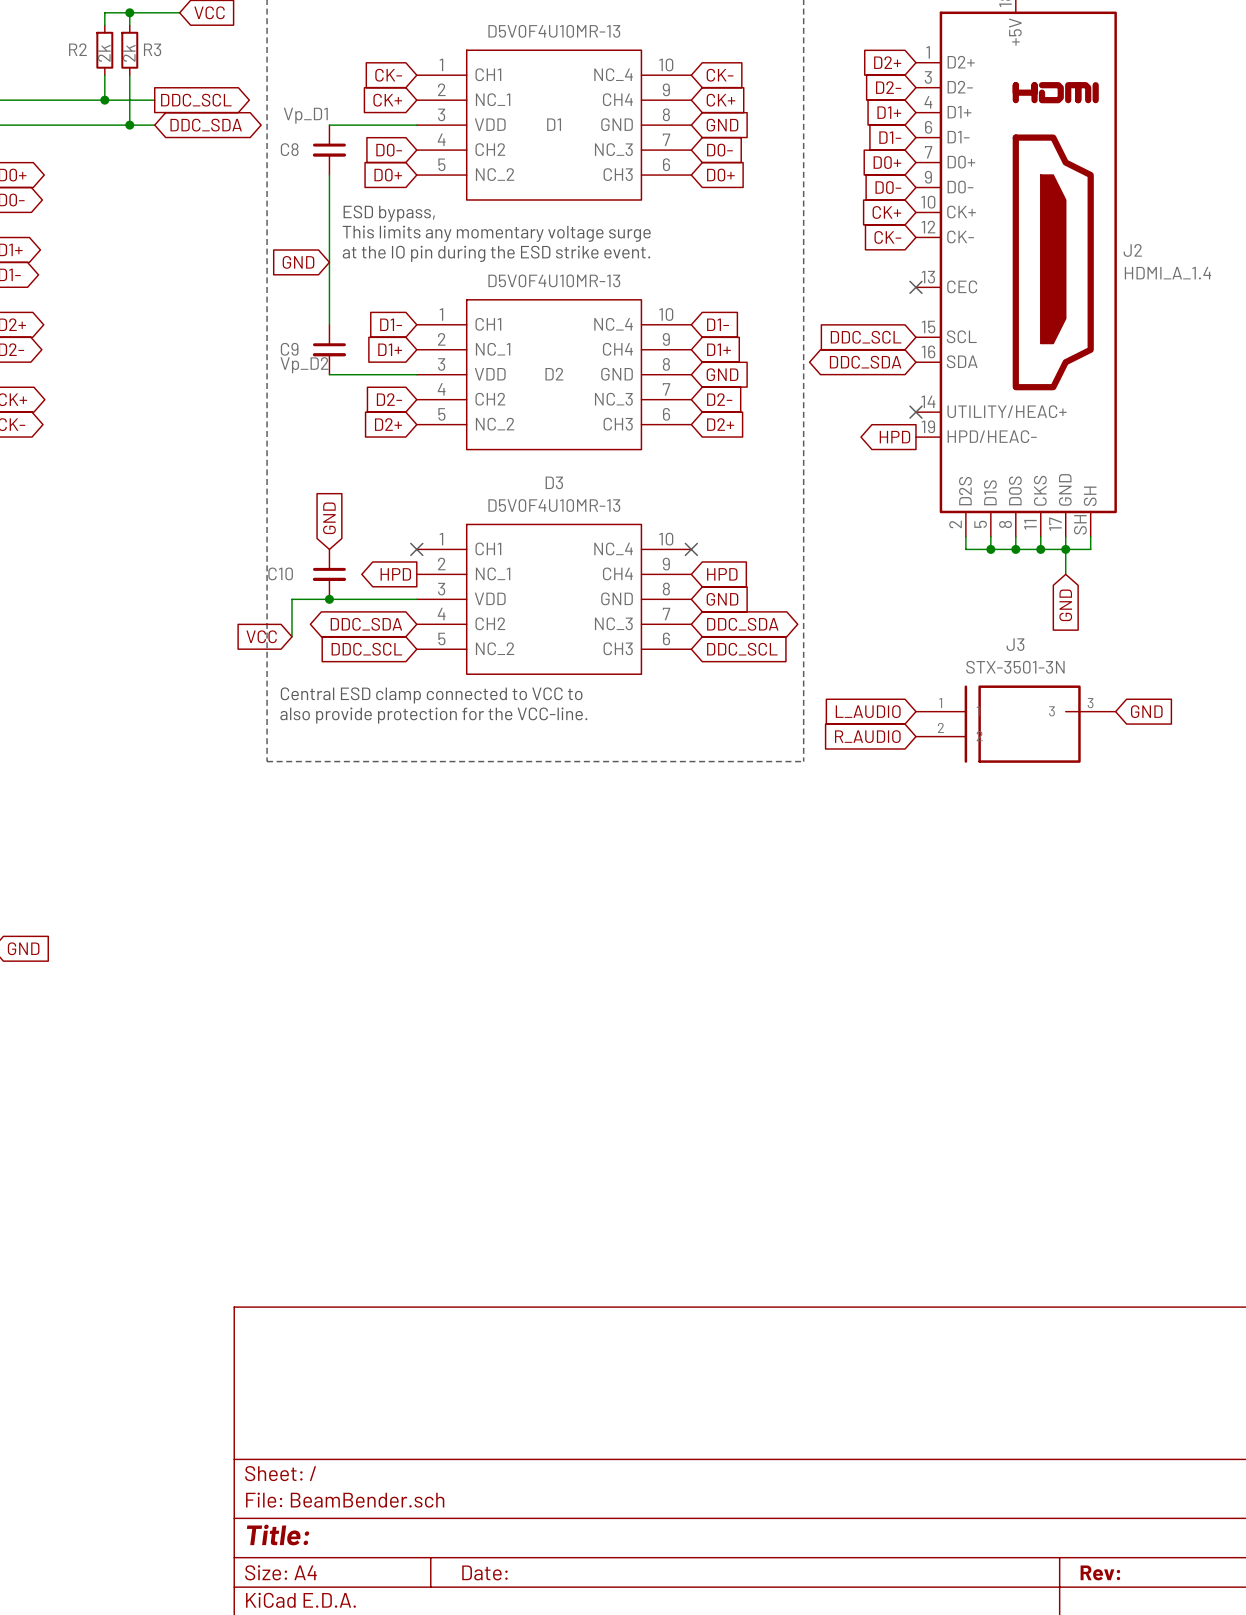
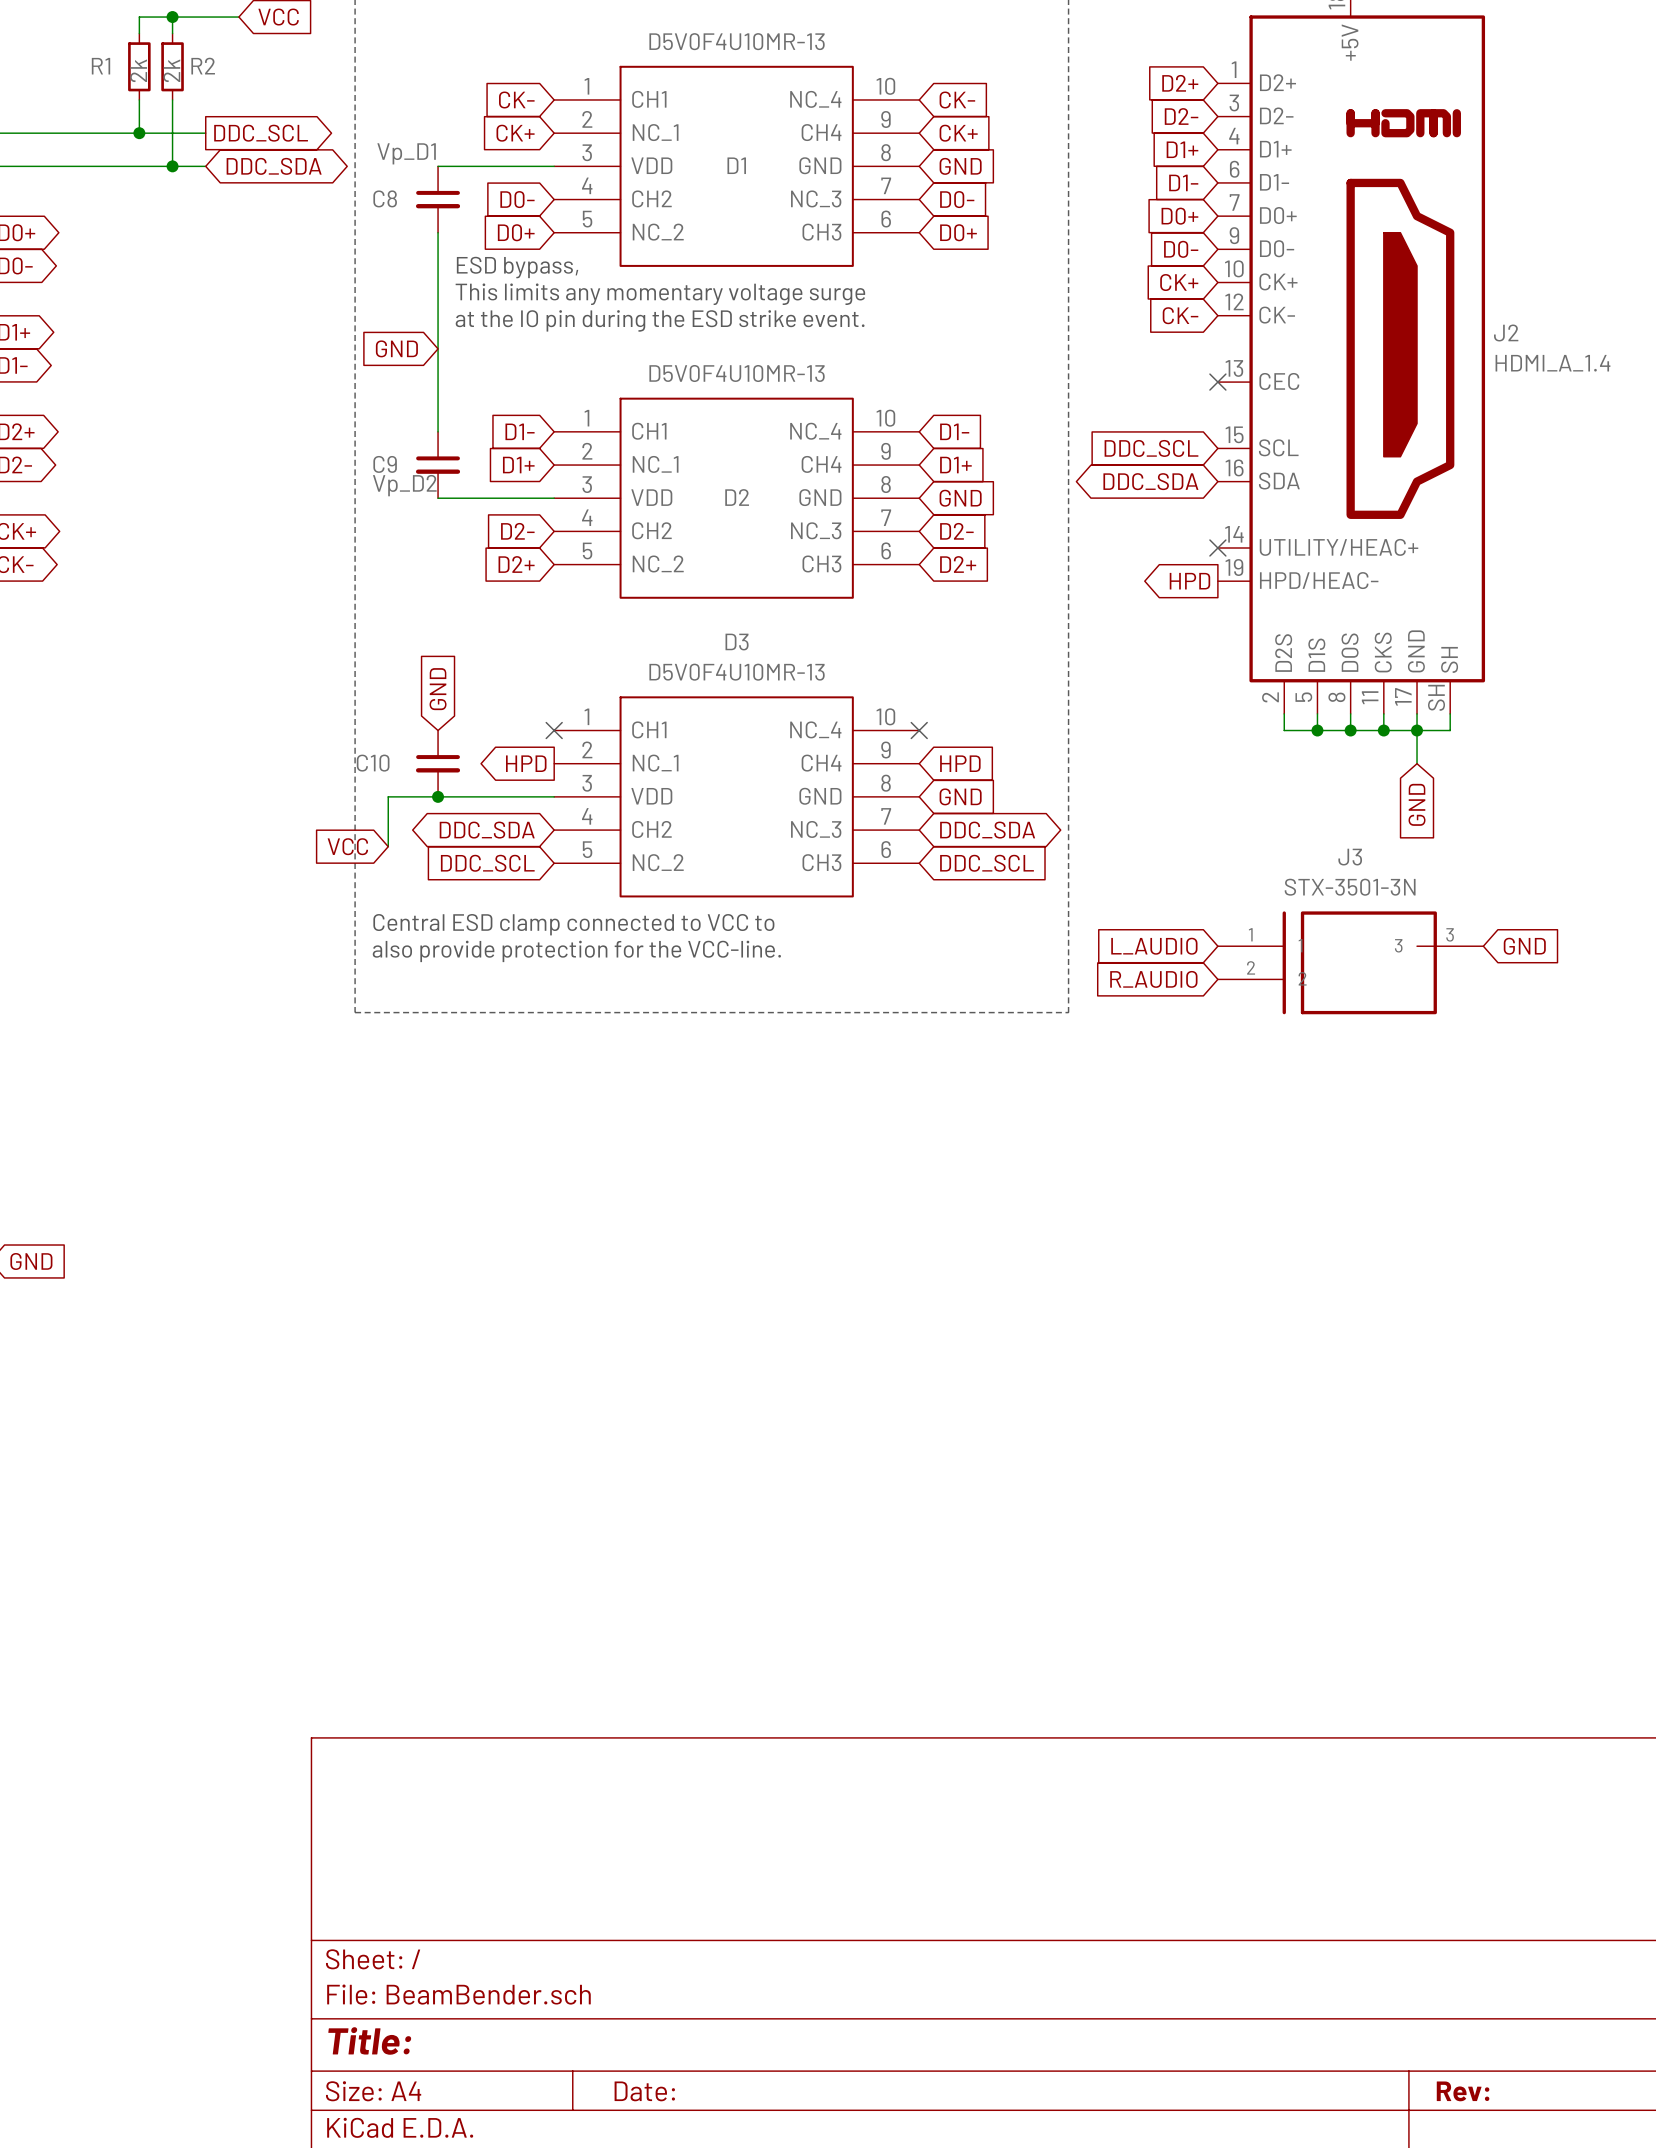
R2 name: R2 (77, 49) -> R1 (101, 66)
R3 name: R3 (152, 49) -> R2 (203, 66)
text position: ESD bypass, (389, 213) -> ESD bypass, (517, 267)
text position: This limits any momentary voltage surge (496, 233) -> This limits any momentary voltage surge (660, 294)
text position: at the IO pin during the ESD strike event. (496, 253) -> at the IO pin during the ESD strike event. (660, 320)

